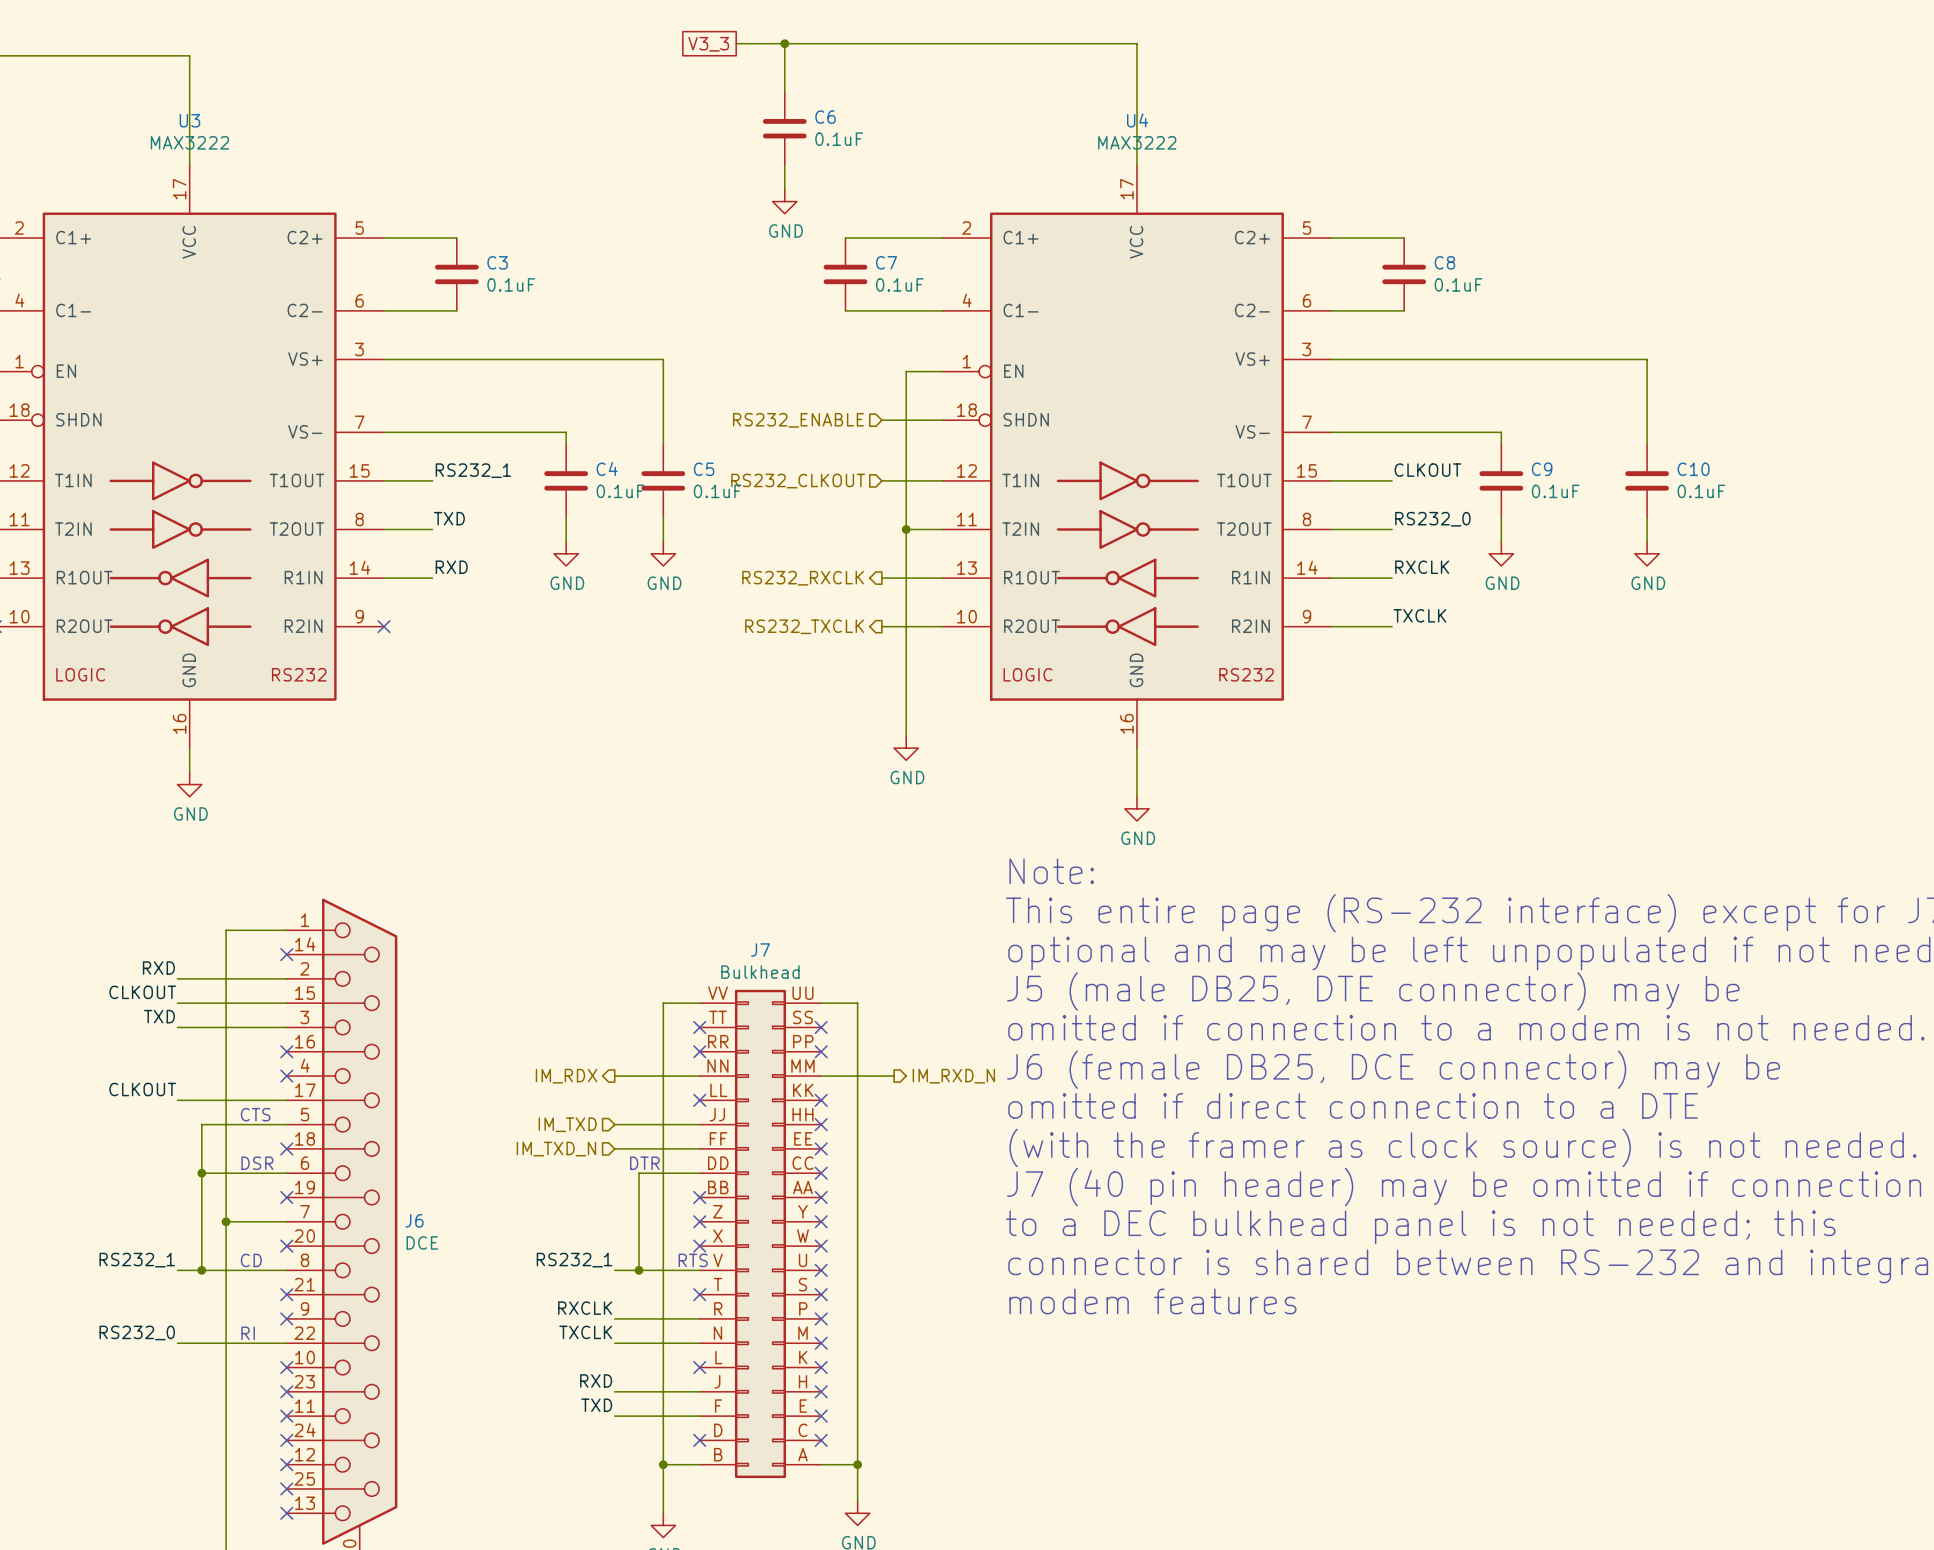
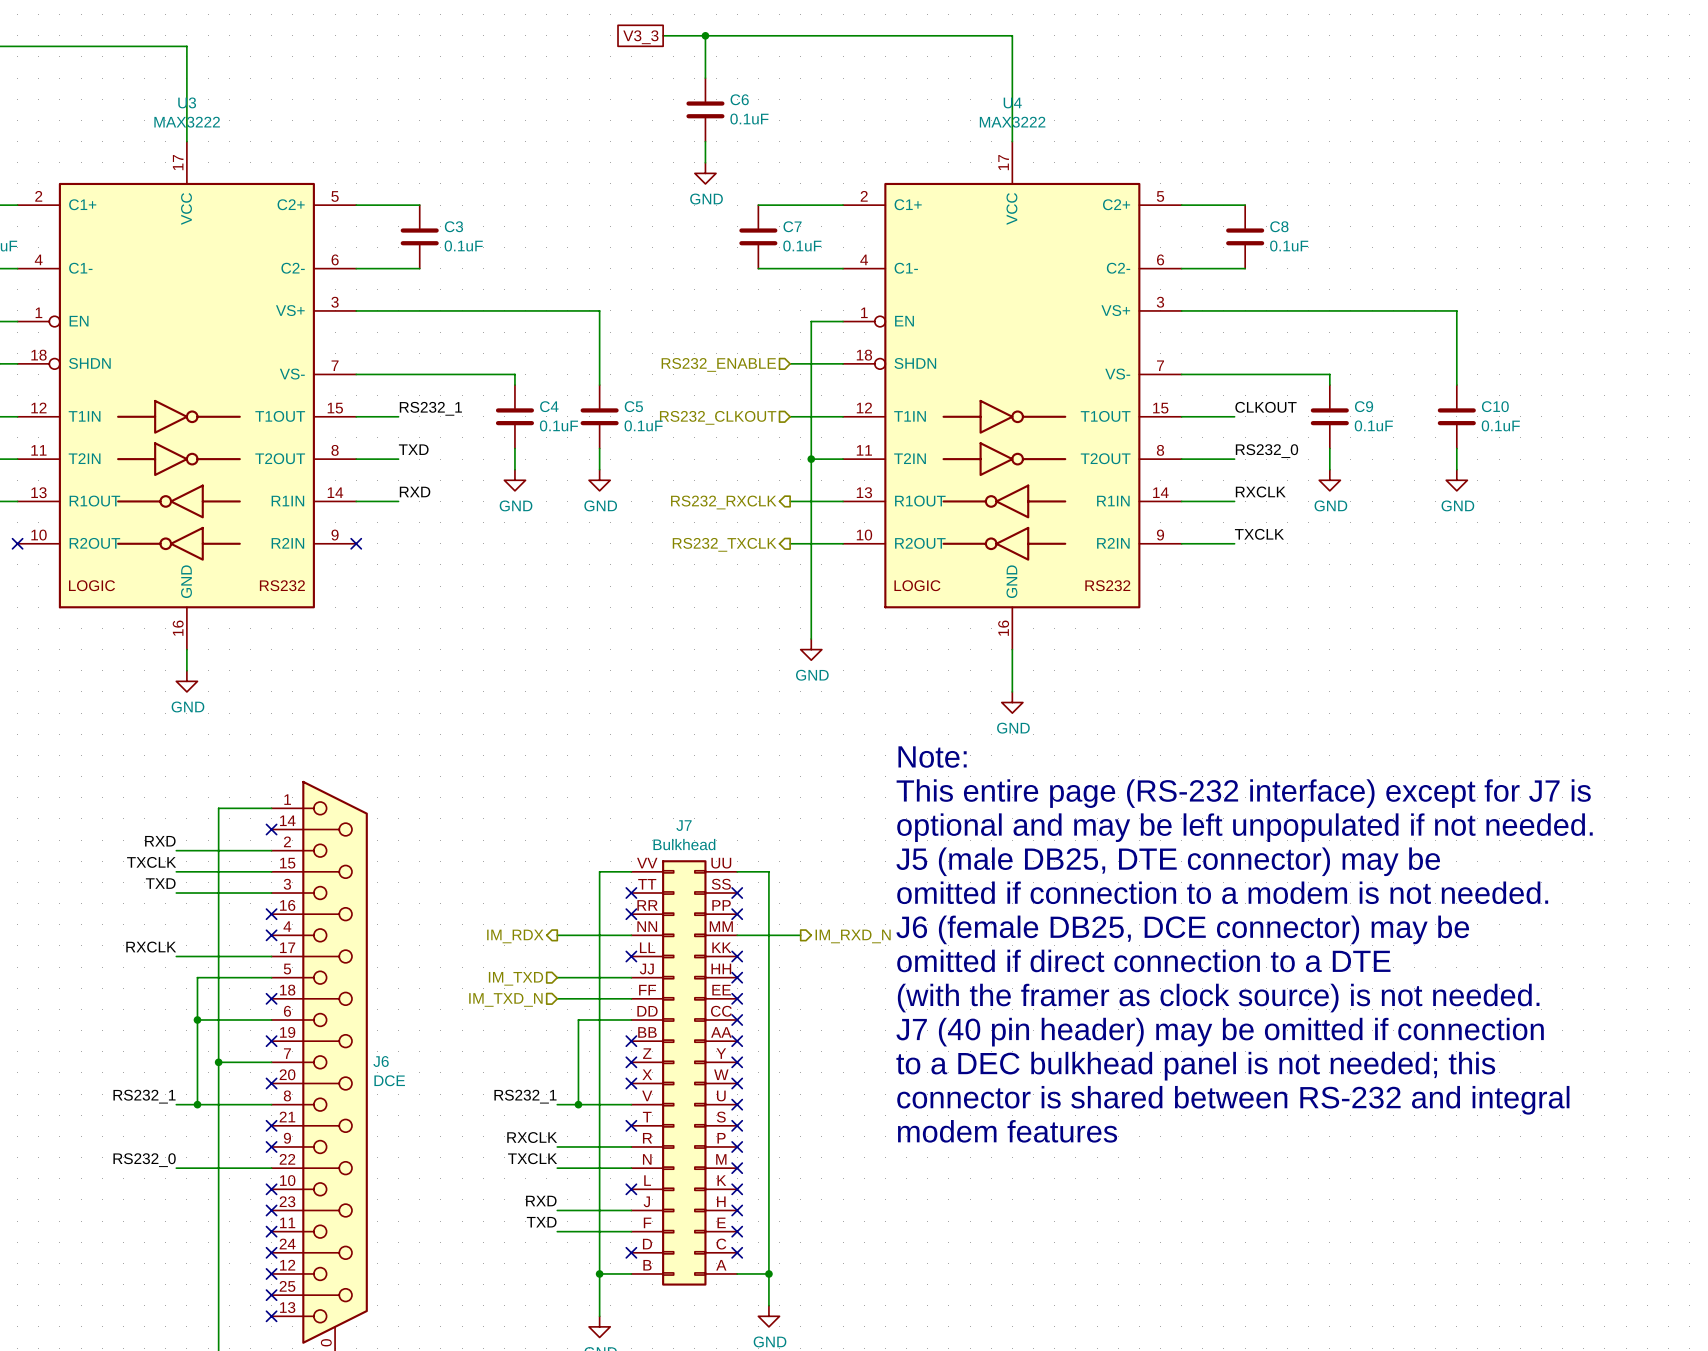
label: CLKOUT (142, 992) -> TXCLK (151, 862)
label: CLKOUT (142, 1089) -> RXCLK (151, 947)
text: CTS (255, 1114) -> none
text: DSR (257, 1163) -> none
text: DTR (644, 1163) -> none
text: CD (251, 1260) -> none
text: RTS (693, 1260) -> none
text: RI (248, 1333) -> none

